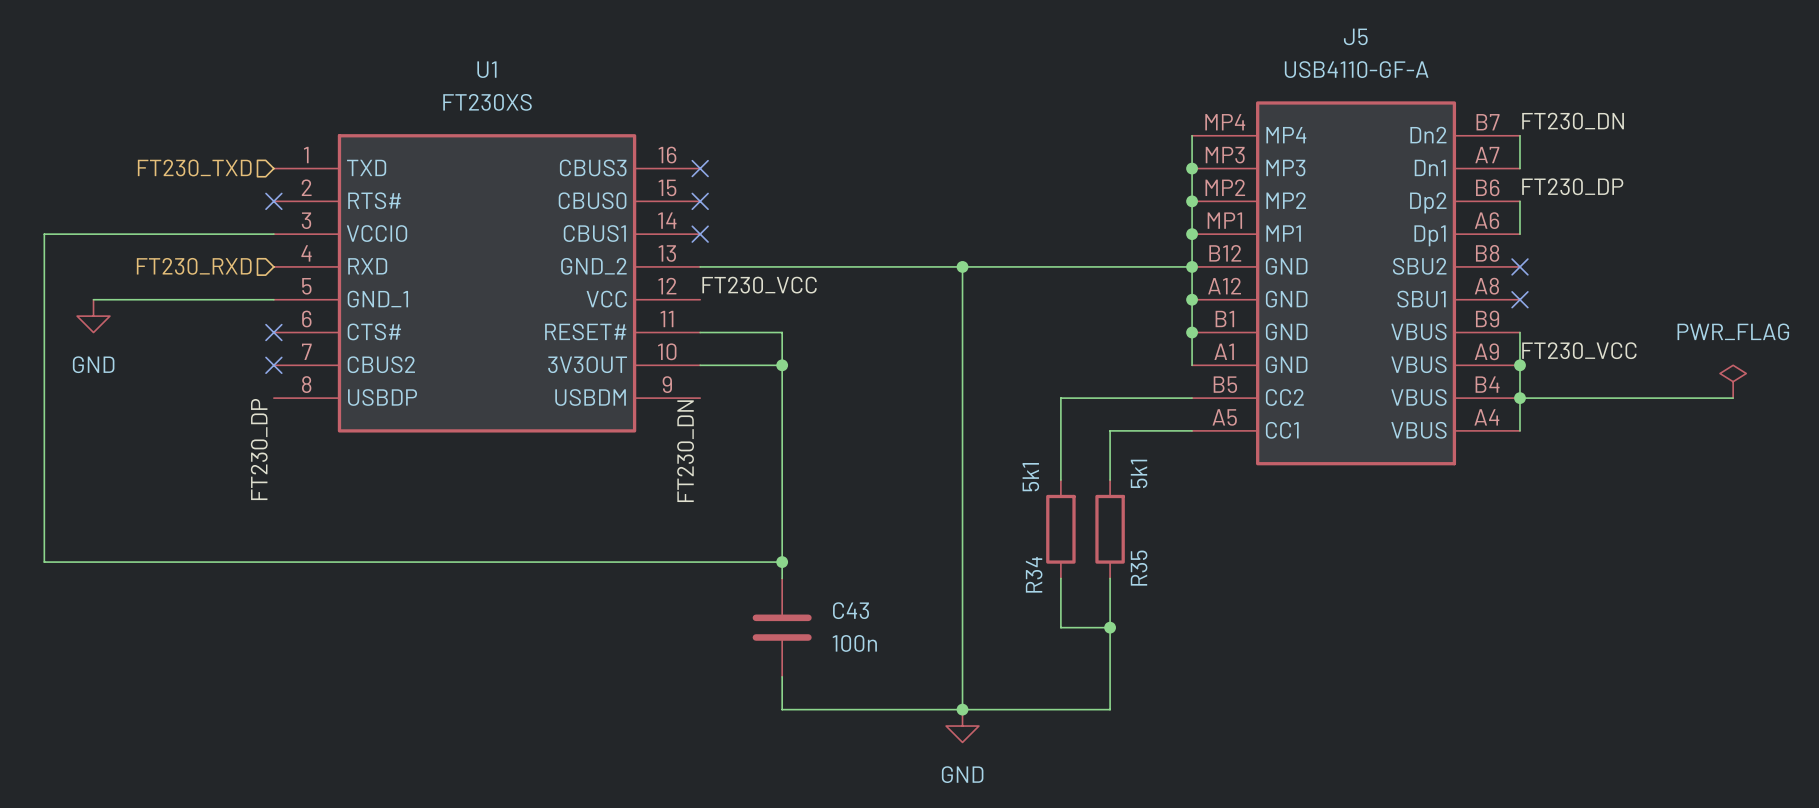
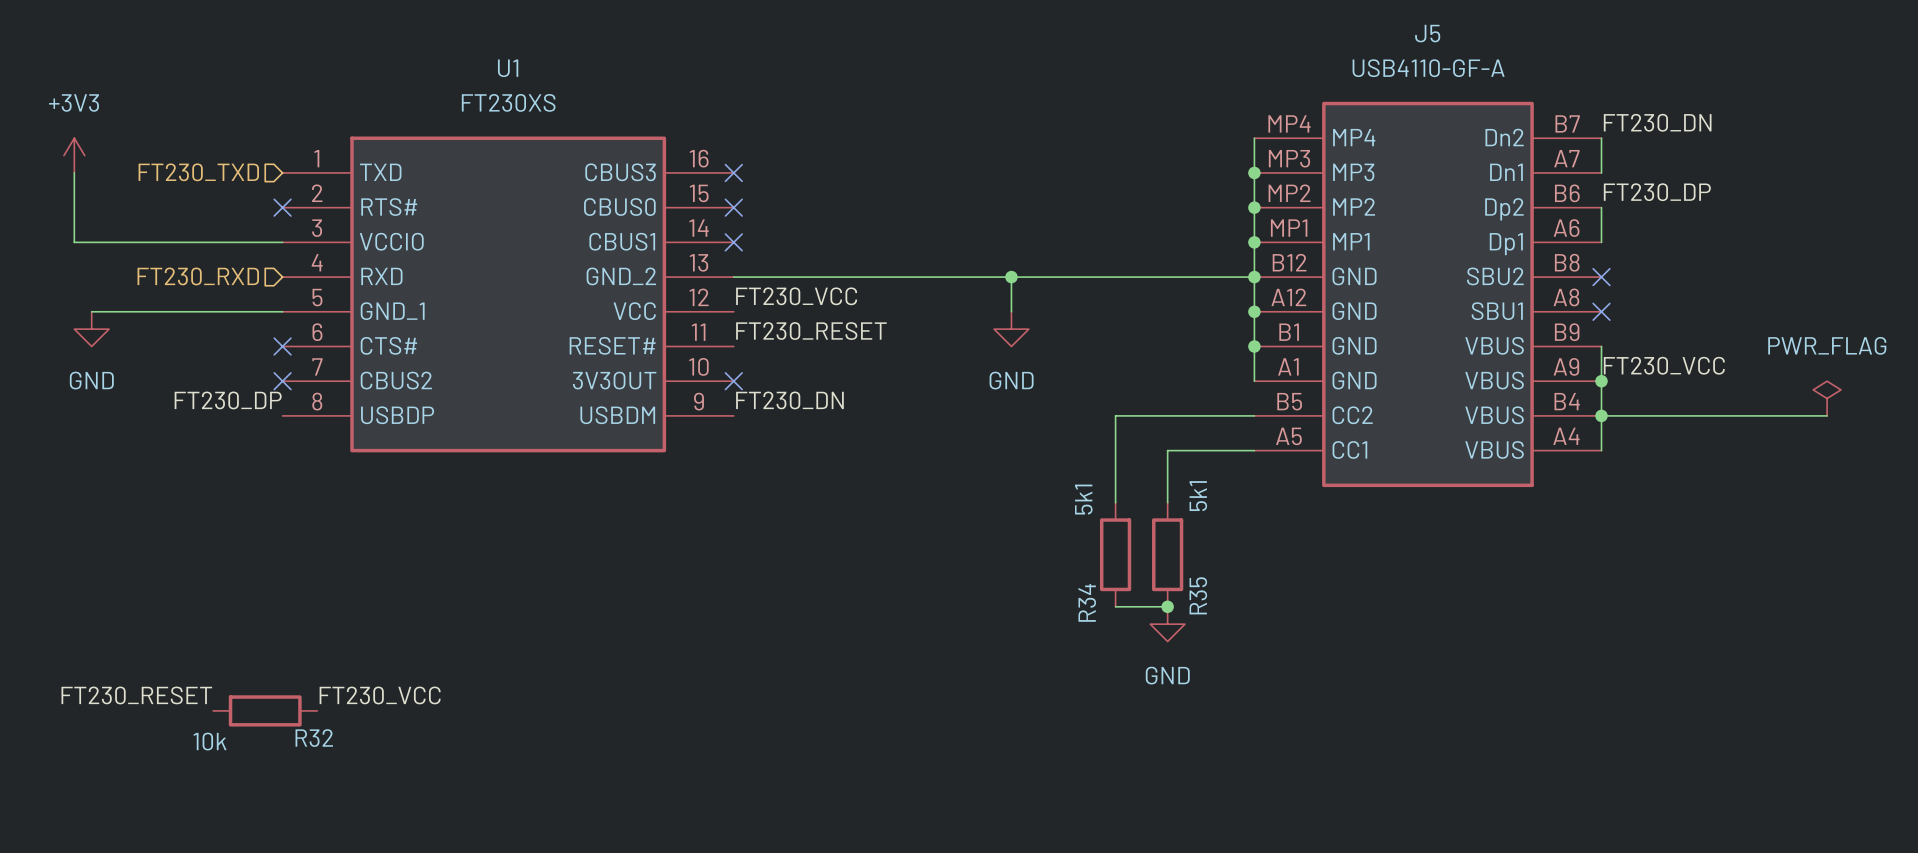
power symbol: none -> +3V3 (74, 155)
wire: (77, 234) (44, 234) (44, 562) (782, 562) -> (74, 242) (74, 172)
wire: (962, 299) (962, 709) -> none
power symbol: none -> GND (1011, 329)
label: none -> FT230_RESET (811, 331)
wire: (700, 332) (782, 332) (782, 578) -> none
wire: (700, 365) (782, 365) -> none
no-connect mark: none -> (733, 381)
junction: (782, 365) -> none
label rotation: 0° (259, 449) -> 90° clockwise (228, 400)
label rotation: 0° (685, 451) -> 90° clockwise (789, 400)
junction: (782, 562) -> none
wire: (1060, 578) (1060, 627) (1110, 627) -> (1115, 606) (1167, 606)
wire: (1110, 578) (1110, 709) (782, 709) (782, 676) -> none
C43: 100n (782, 627) -> none
junction position: (1110, 627) -> (1167, 606)
label: none -> FT230_RESET (136, 695)
label: none -> FT230_VCC (380, 695)
R32: none -> 10k (265, 710)
junction: (962, 709) -> none
power symbol position: GND (962, 726) -> GND (1167, 624)

